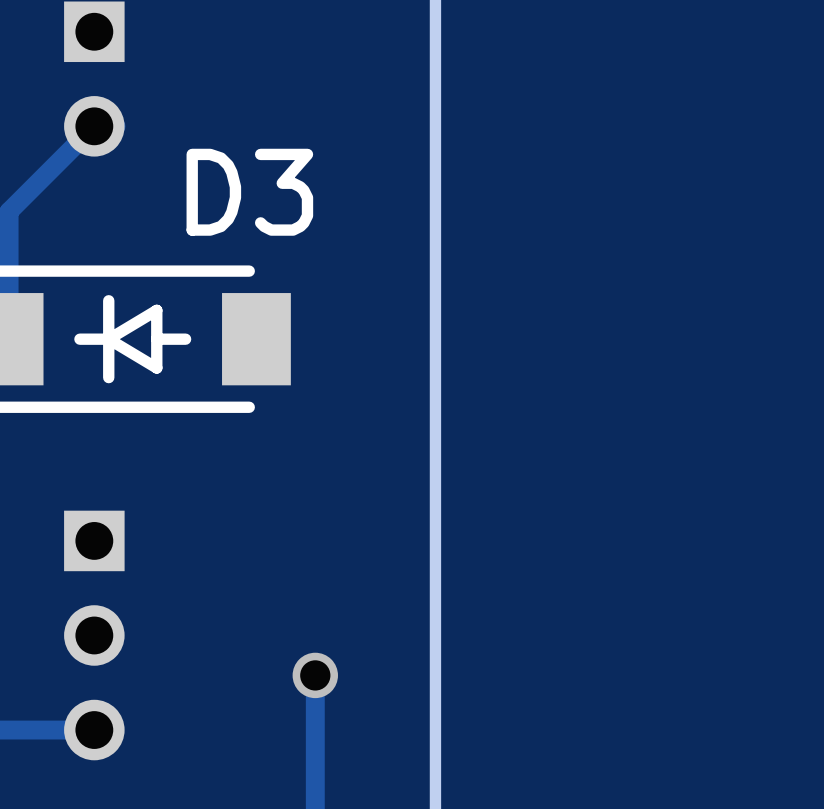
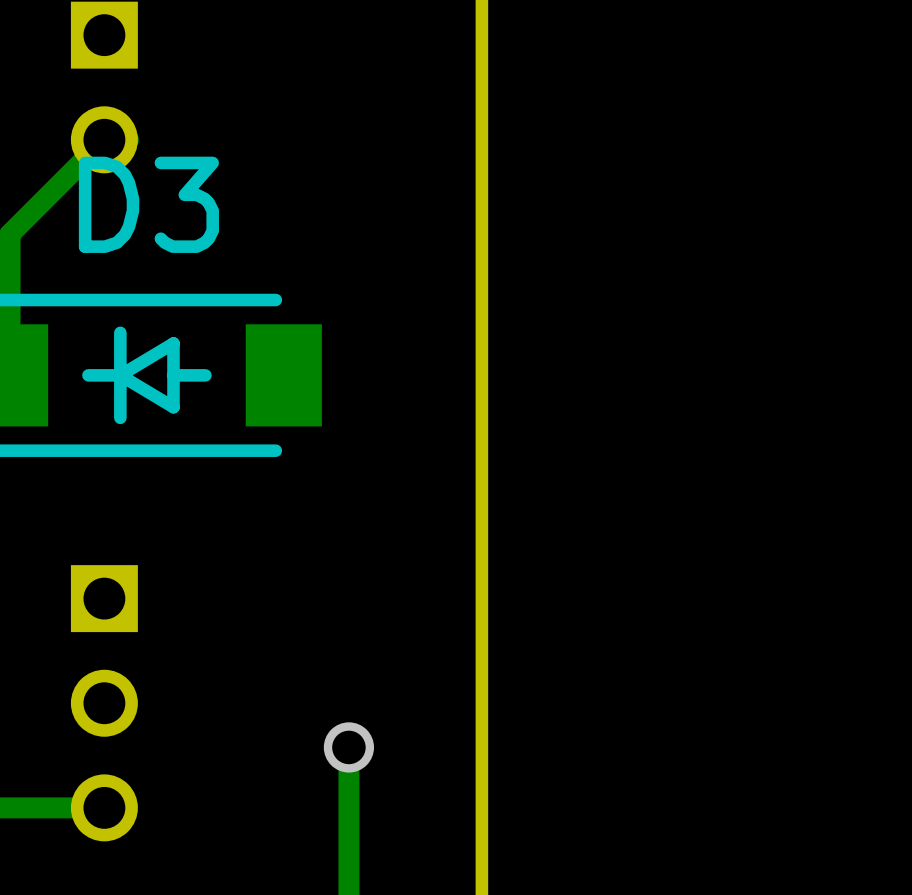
D3 name position: D3 (249, 192) -> D3 (148, 204)

